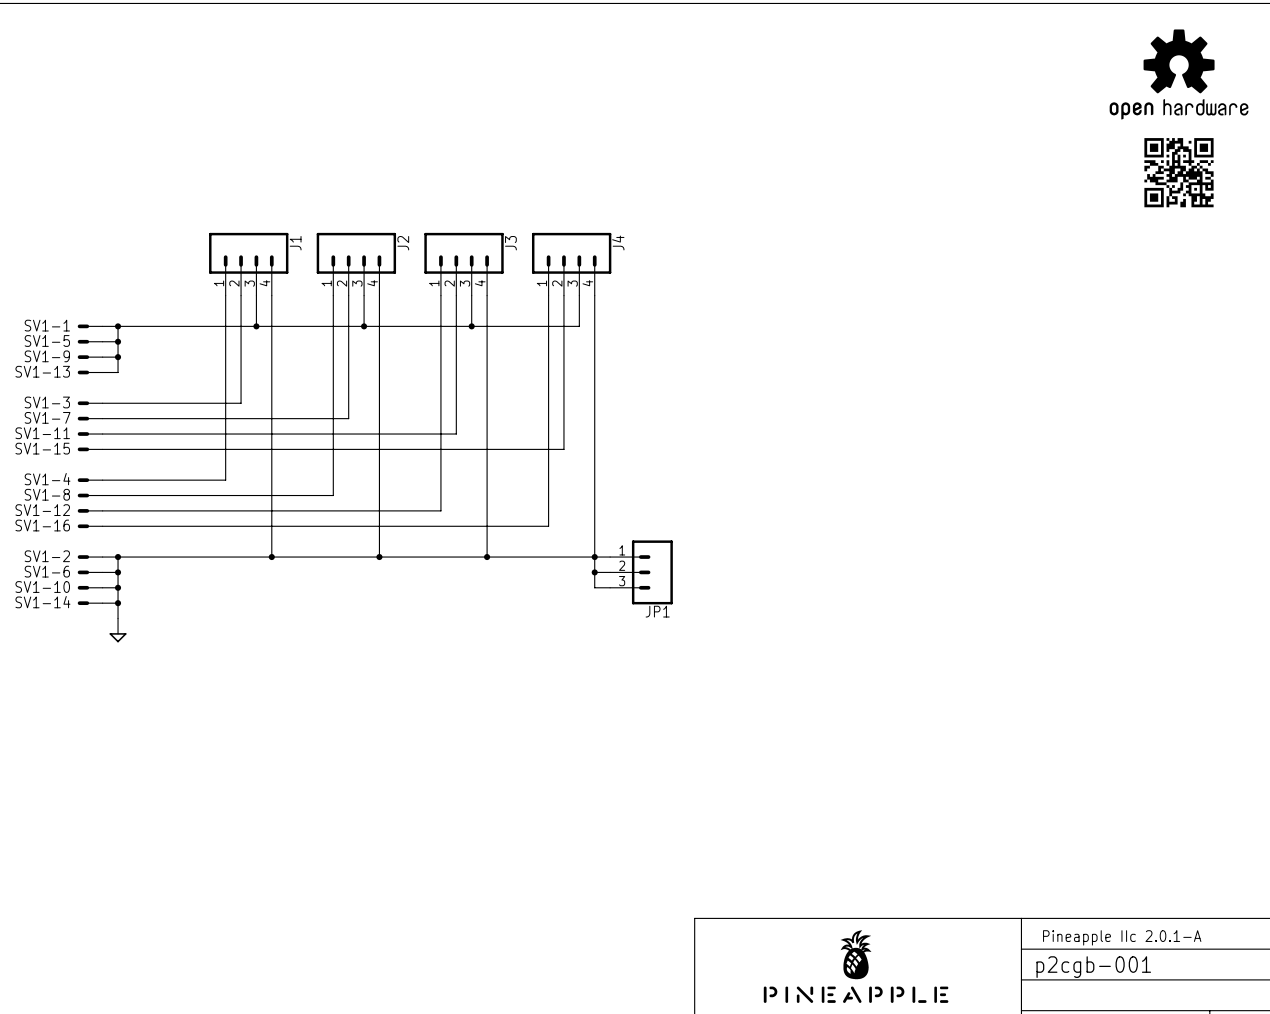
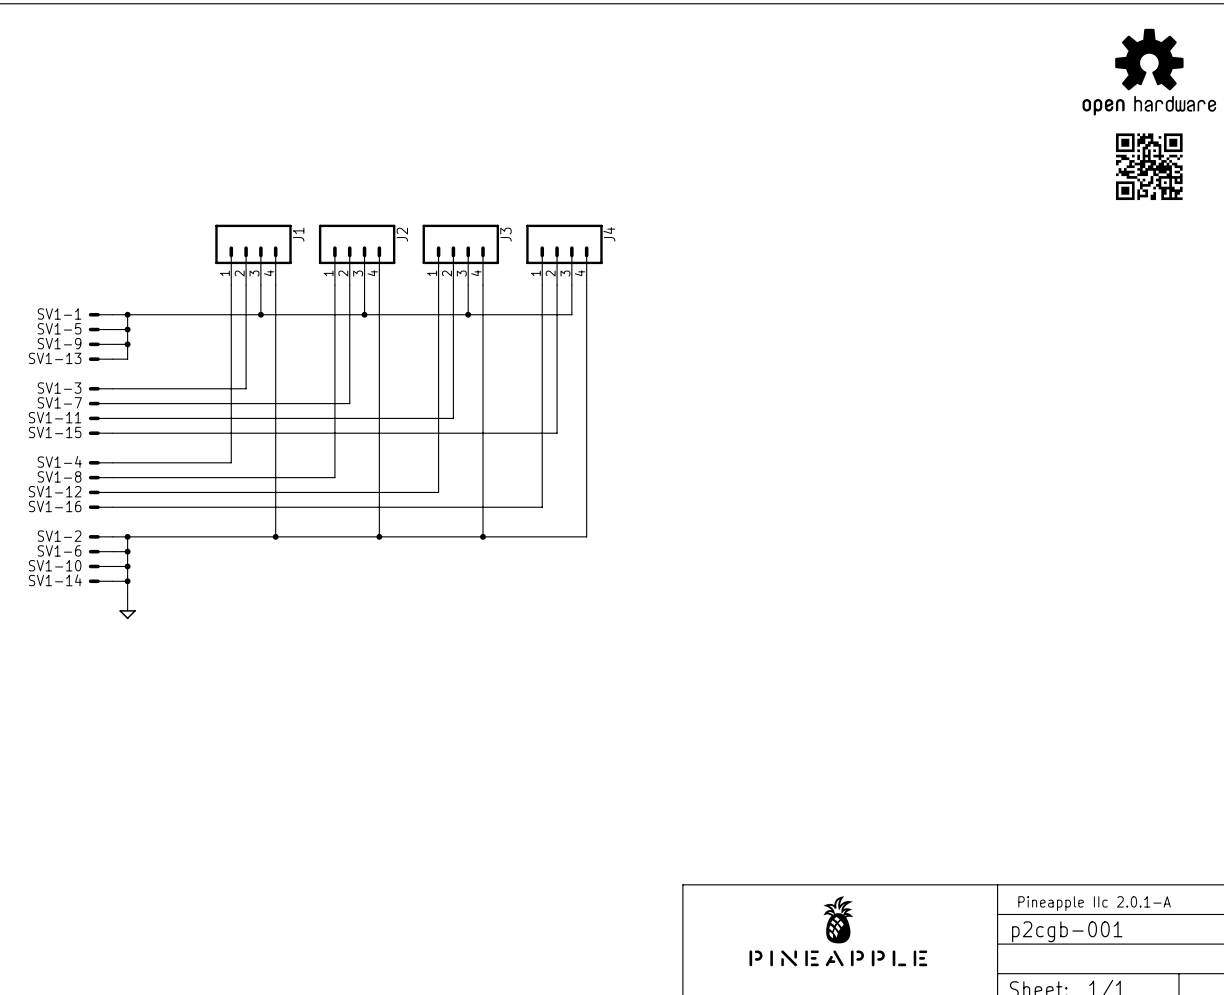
junction: (594, 557) -> none
wire: (610, 557) (594, 557) (594, 587) (610, 587) -> none
wire: (594, 572) (610, 572) -> none
junction: (594, 572) -> none
JP1: (641, 572) -> none

